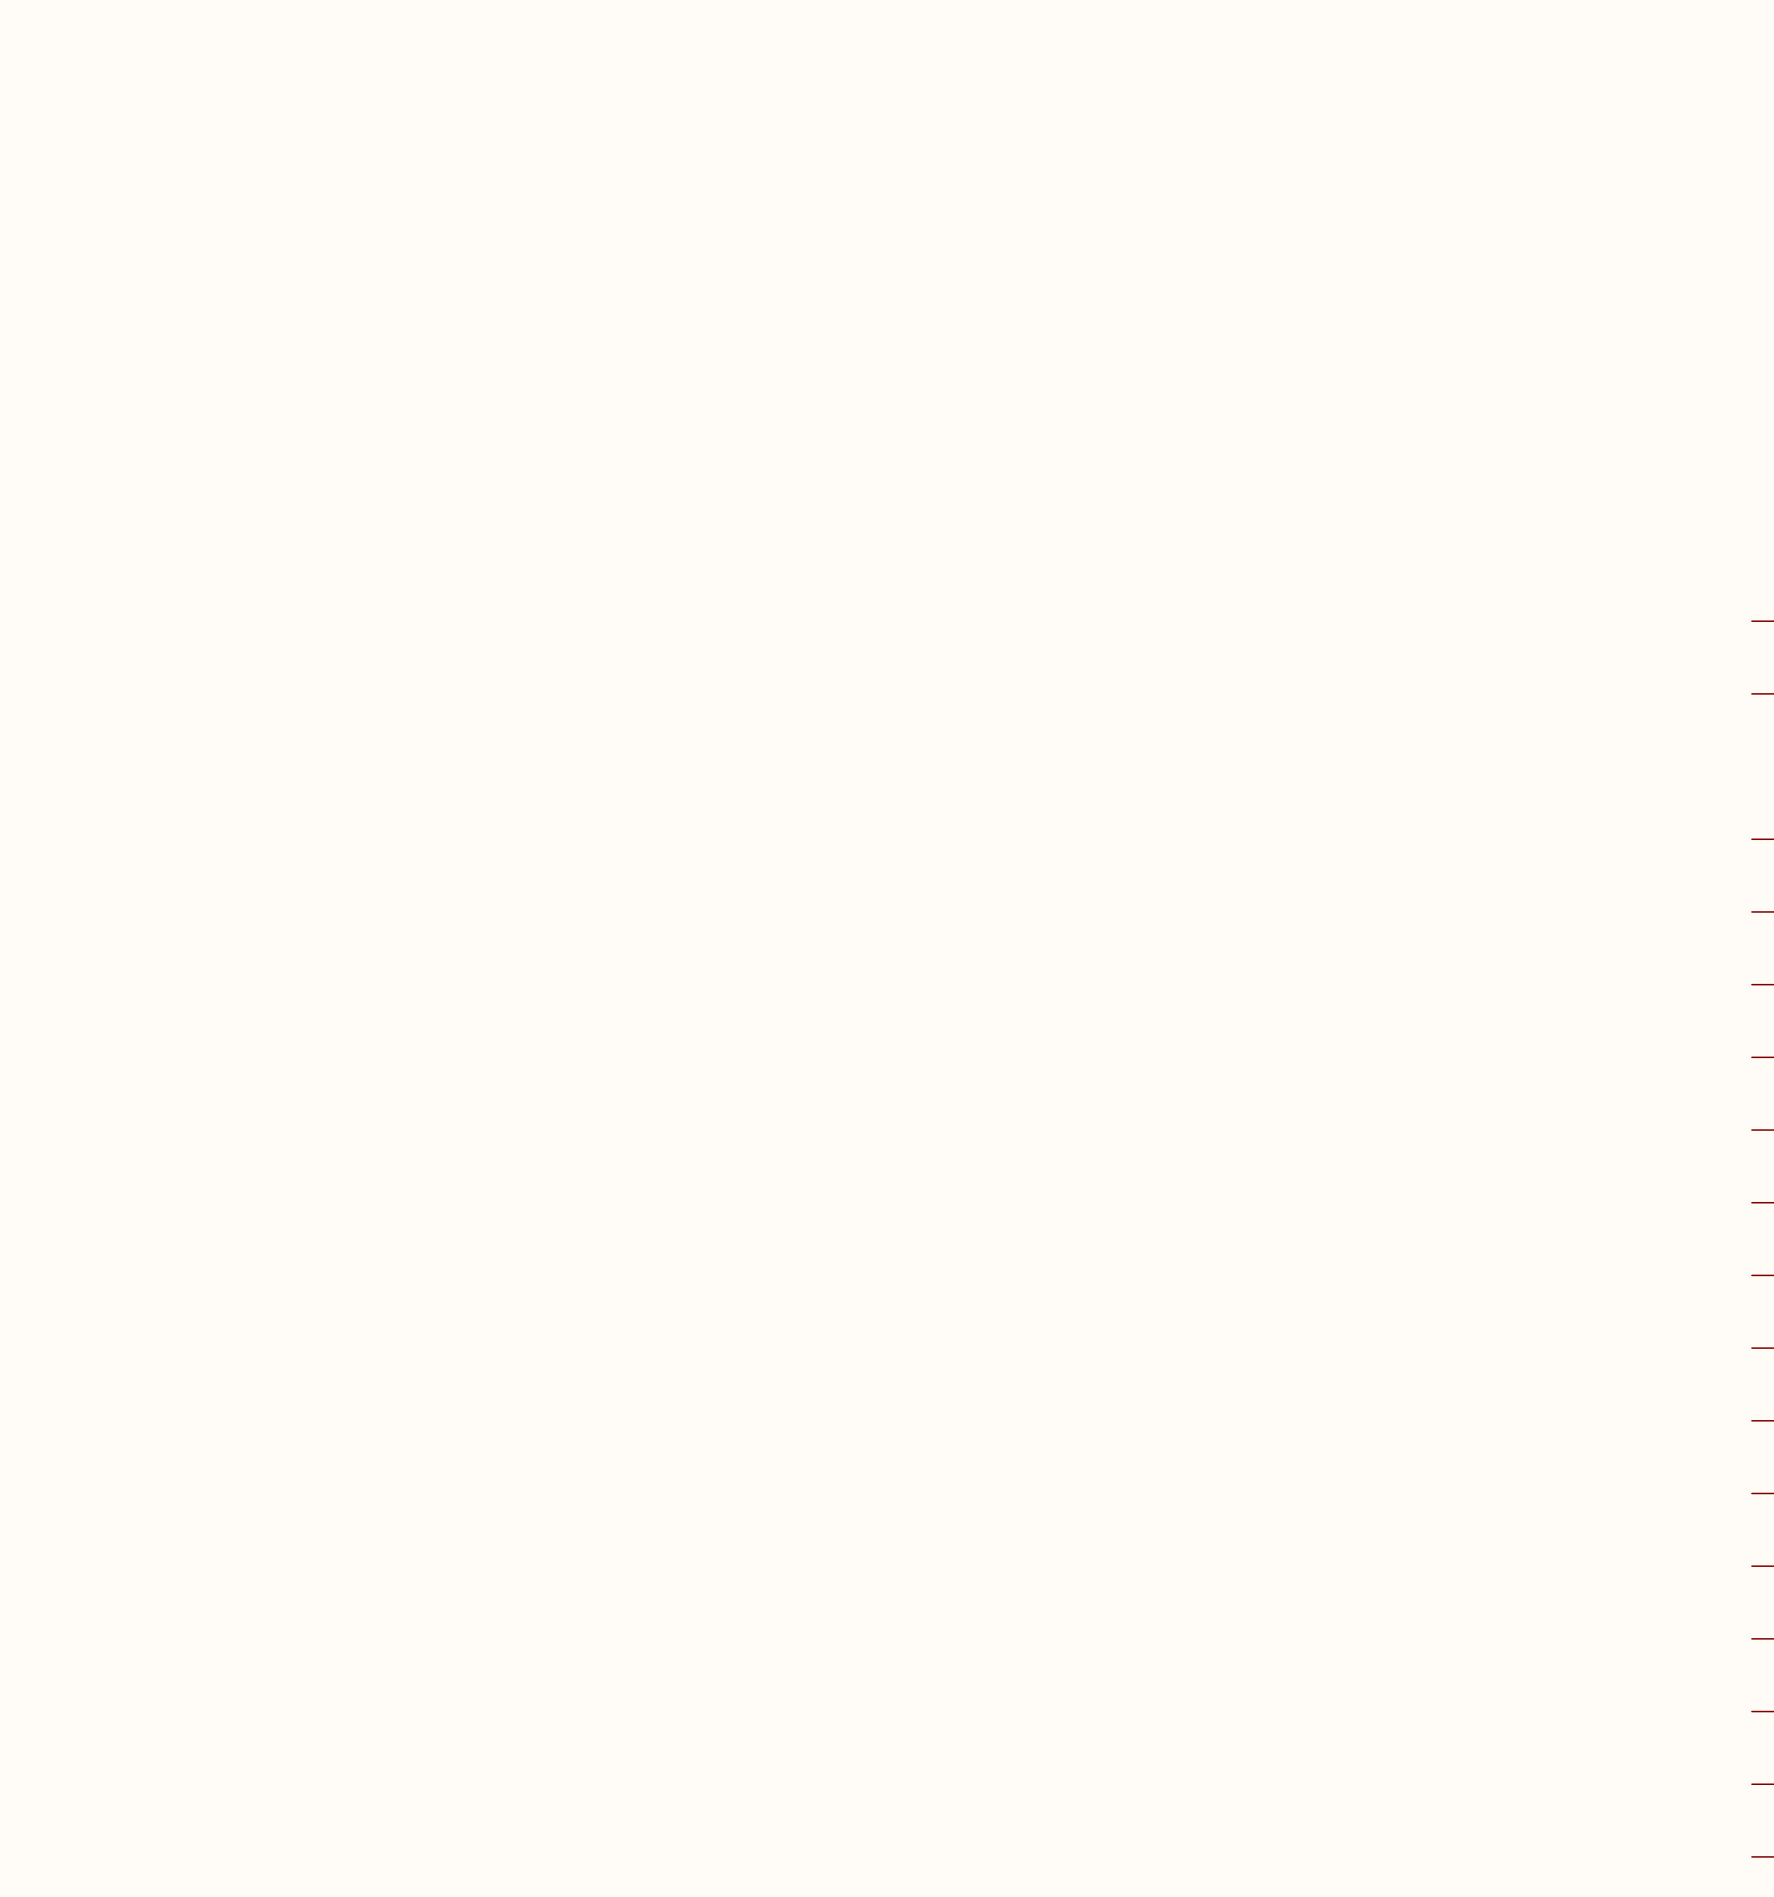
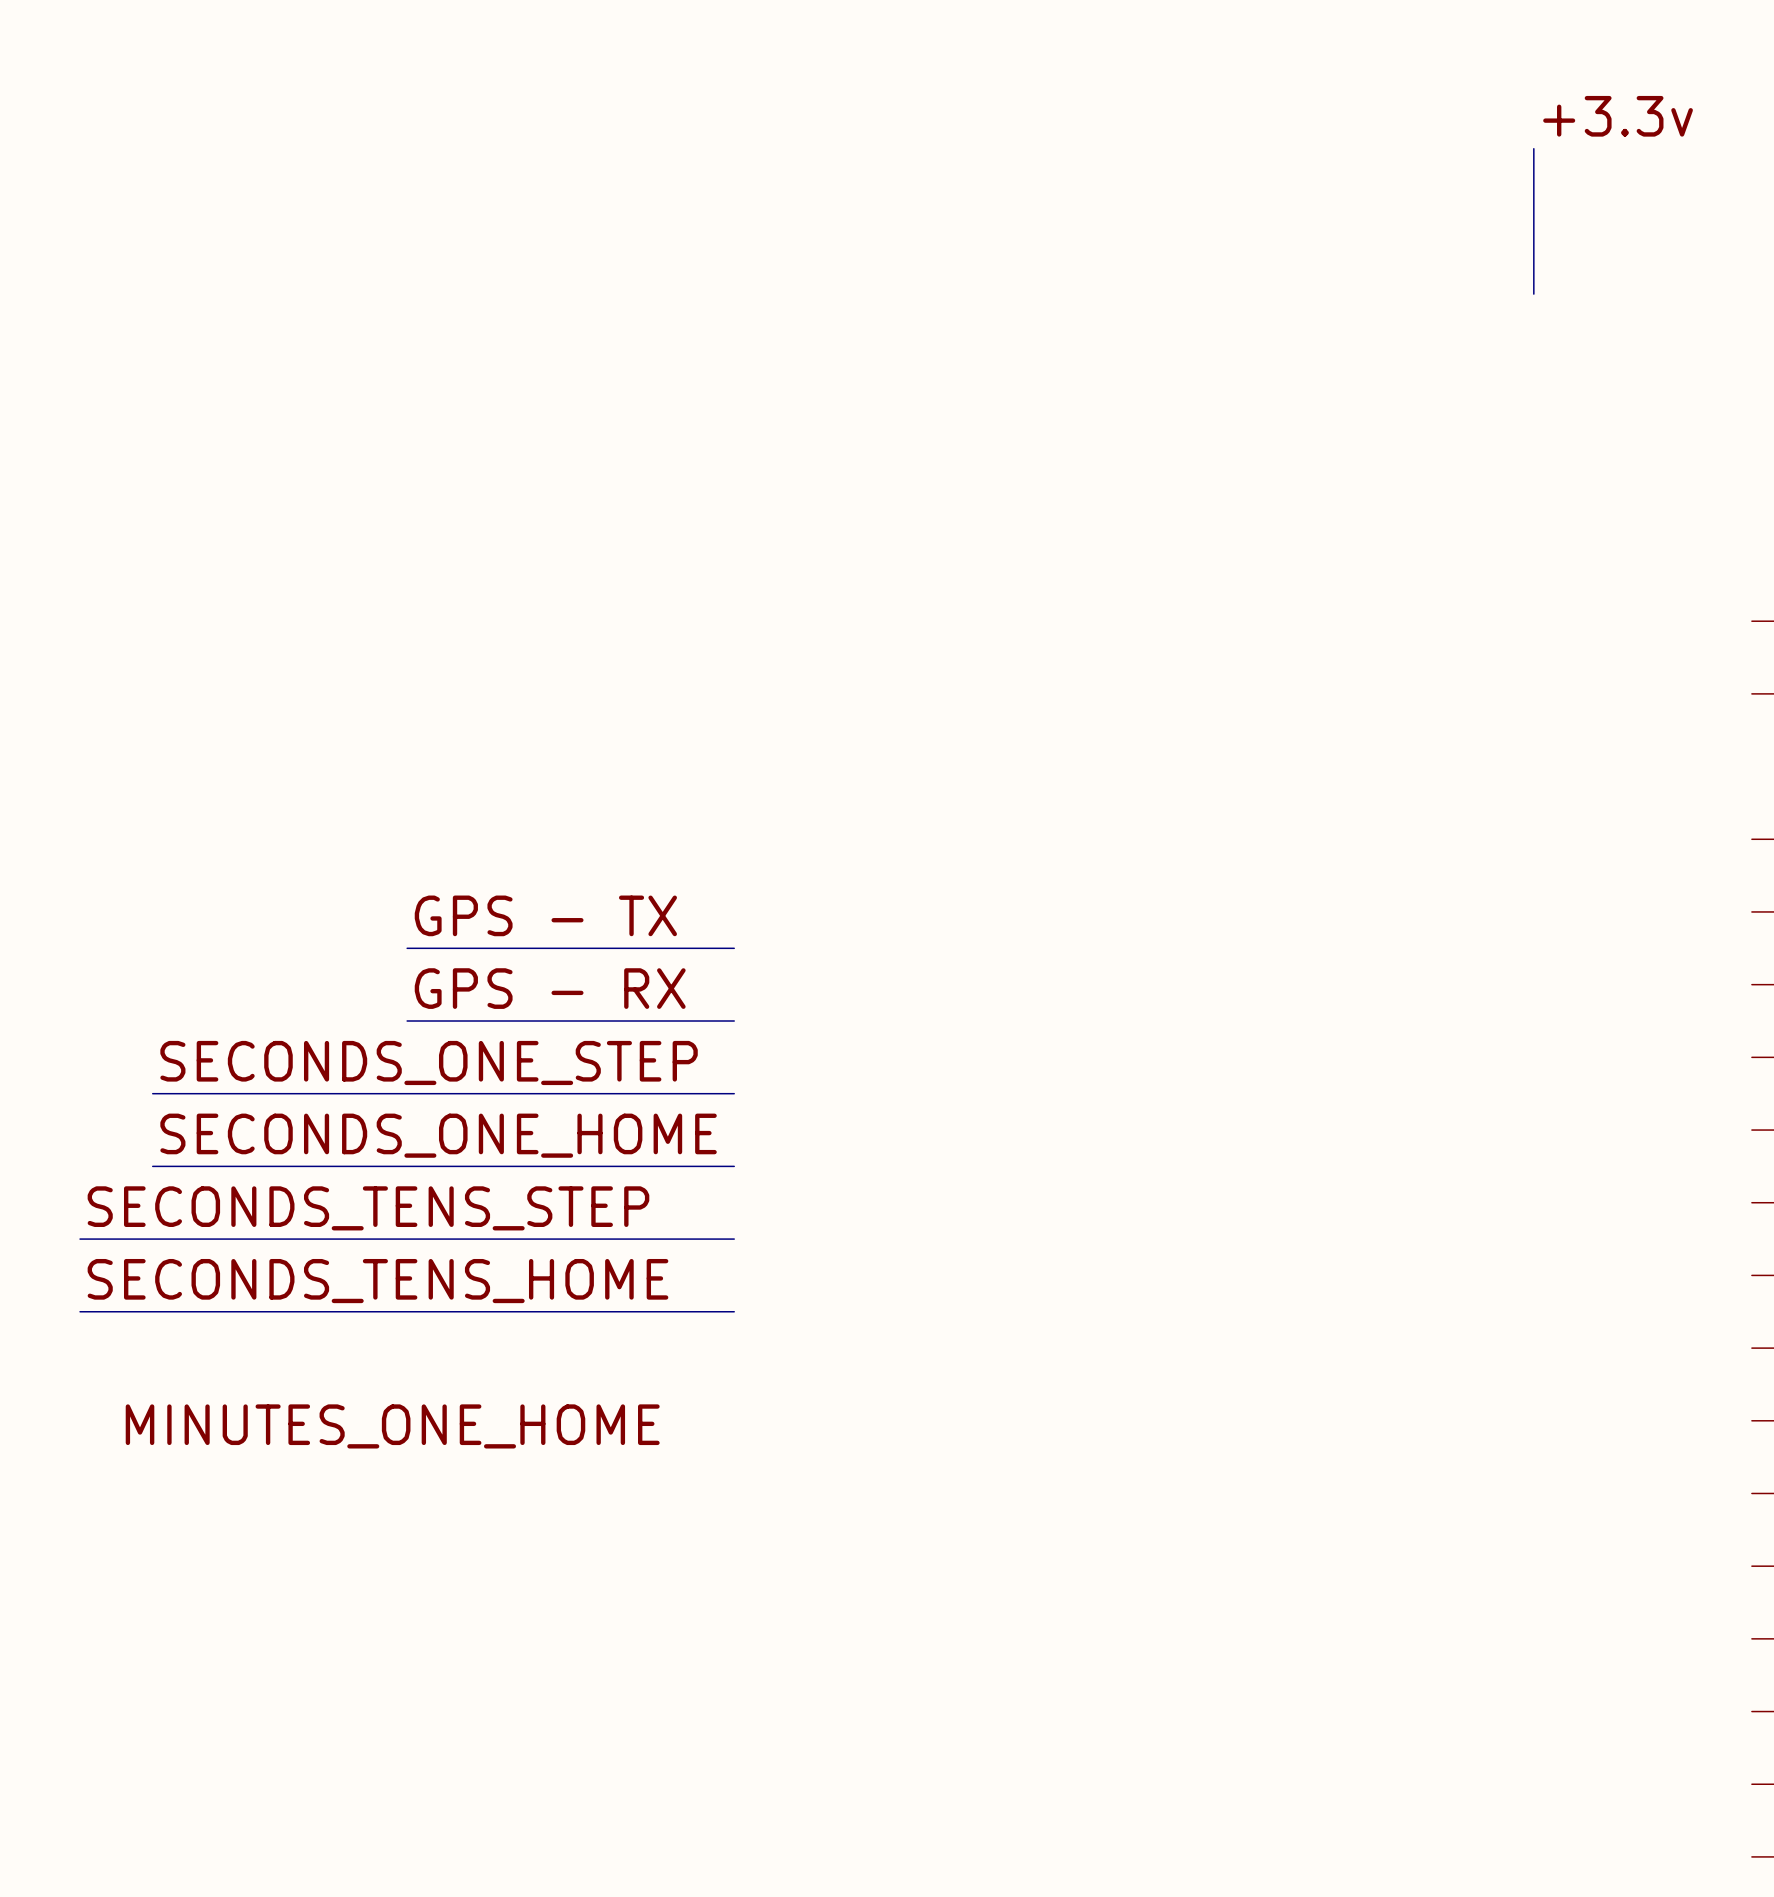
label: none -> +3.3v (1618, 116)
wire: none -> (1533, 148) (1533, 294)
label: none -> GPS - TX (545, 915)
wire: none -> (407, 948) (734, 948)
label: none -> GPS - RX (550, 988)
wire: none -> (407, 1021) (734, 1021)
label: none -> SECONDS_ONE_STEP (429, 1062)
wire: none -> (152, 1093) (734, 1093)
label: none -> SECONDS_ONE_HOME (438, 1135)
wire: none -> (152, 1166) (734, 1166)
label: none -> SECONDS_TENS_STEP (368, 1208)
wire: none -> (80, 1239) (734, 1239)
label: none -> SECONDS_TENS_HOME (377, 1281)
wire: none -> (80, 1311) (734, 1311)
label: none -> MINUTES_ONE_HOME (392, 1426)

